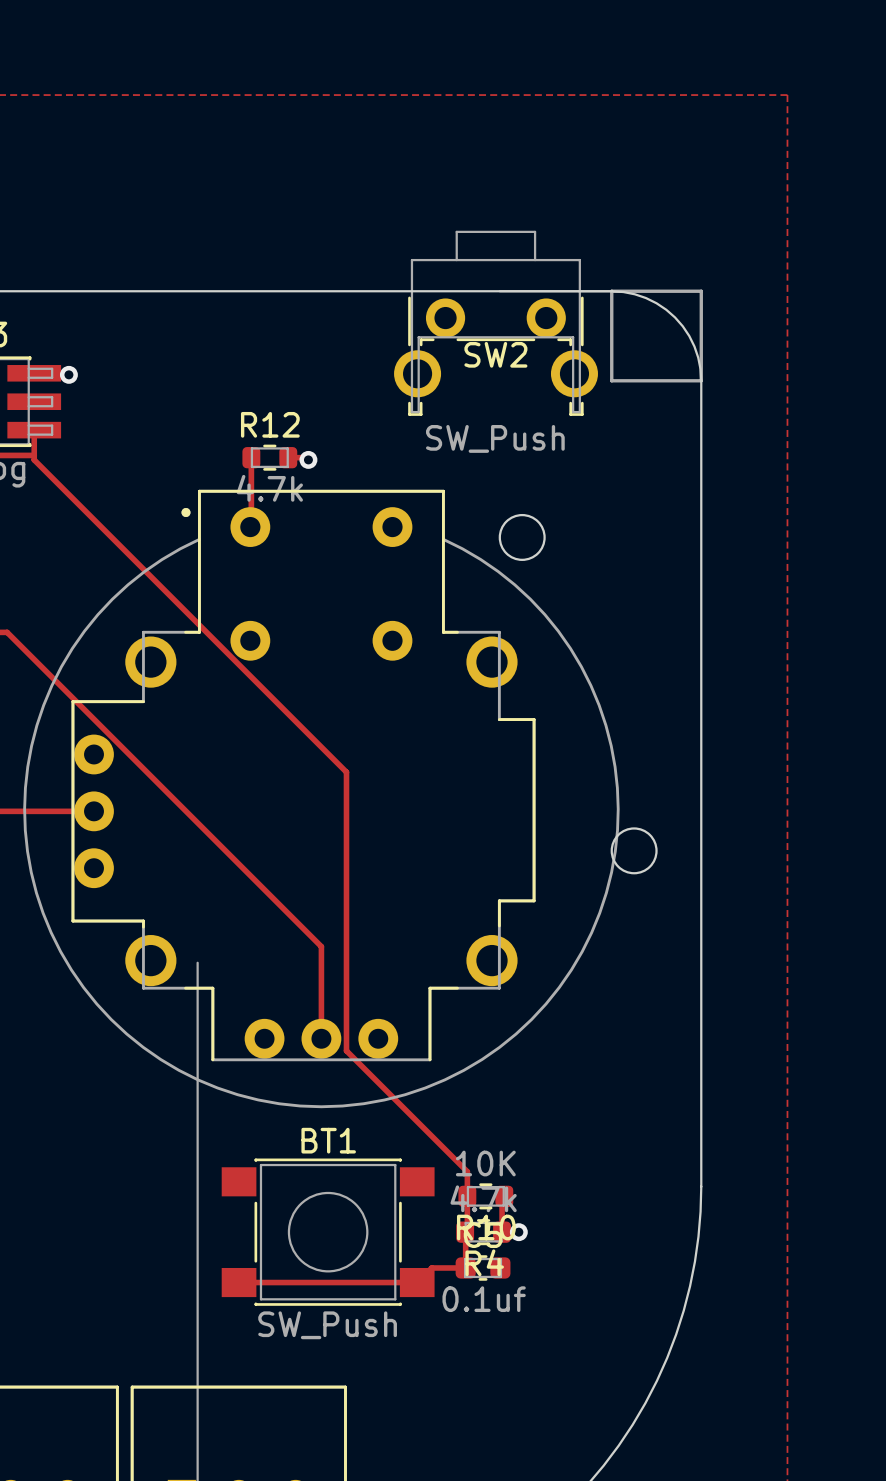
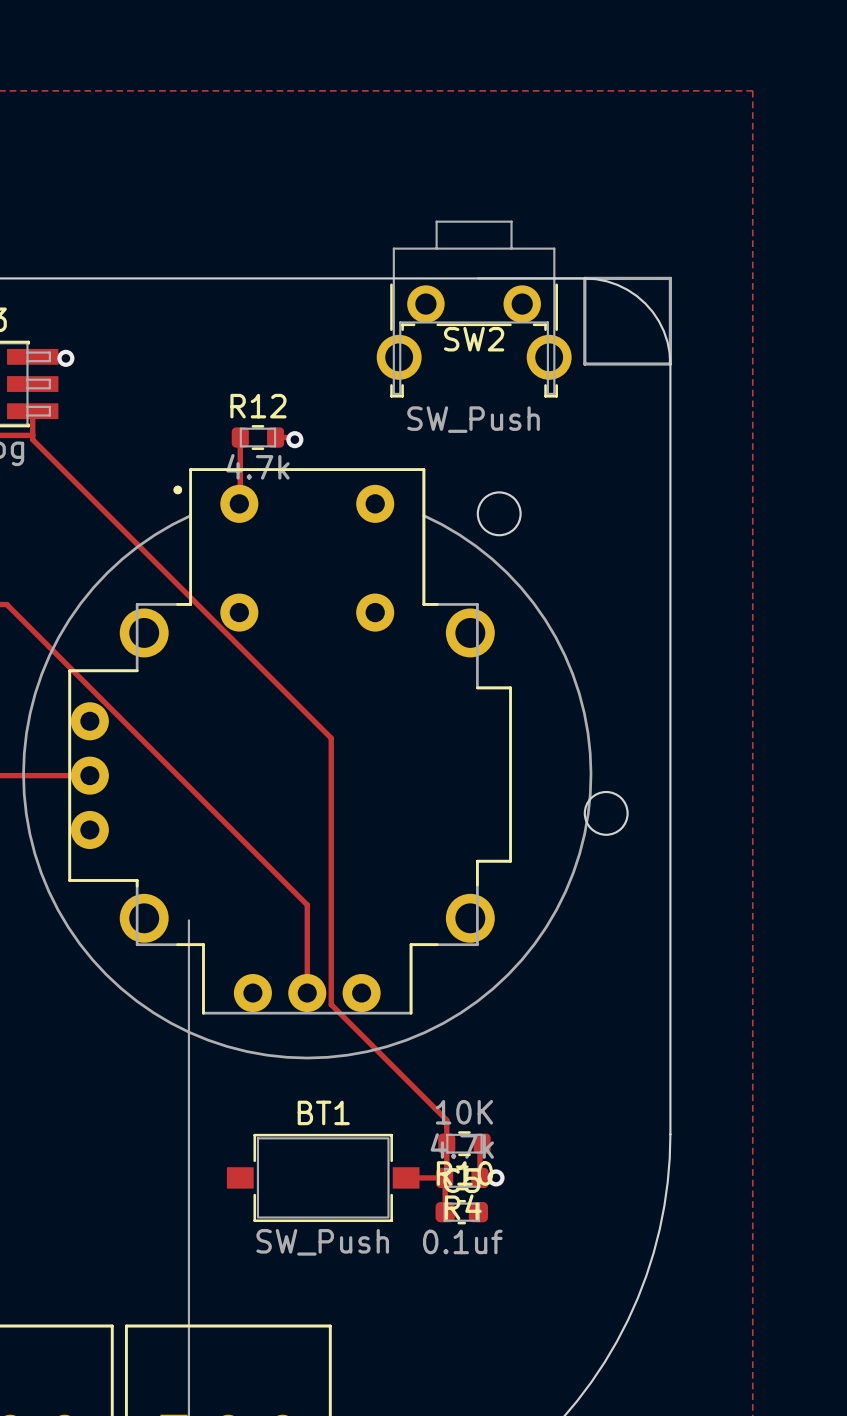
BT1 footprint: [221, 1158, 435, 1306] -> [226, 1133, 420, 1223]
track: none -> (406, 1177) (444, 1177)
track: (465, 1267) (431, 1267) (417, 1282) (239, 1282) -> none

